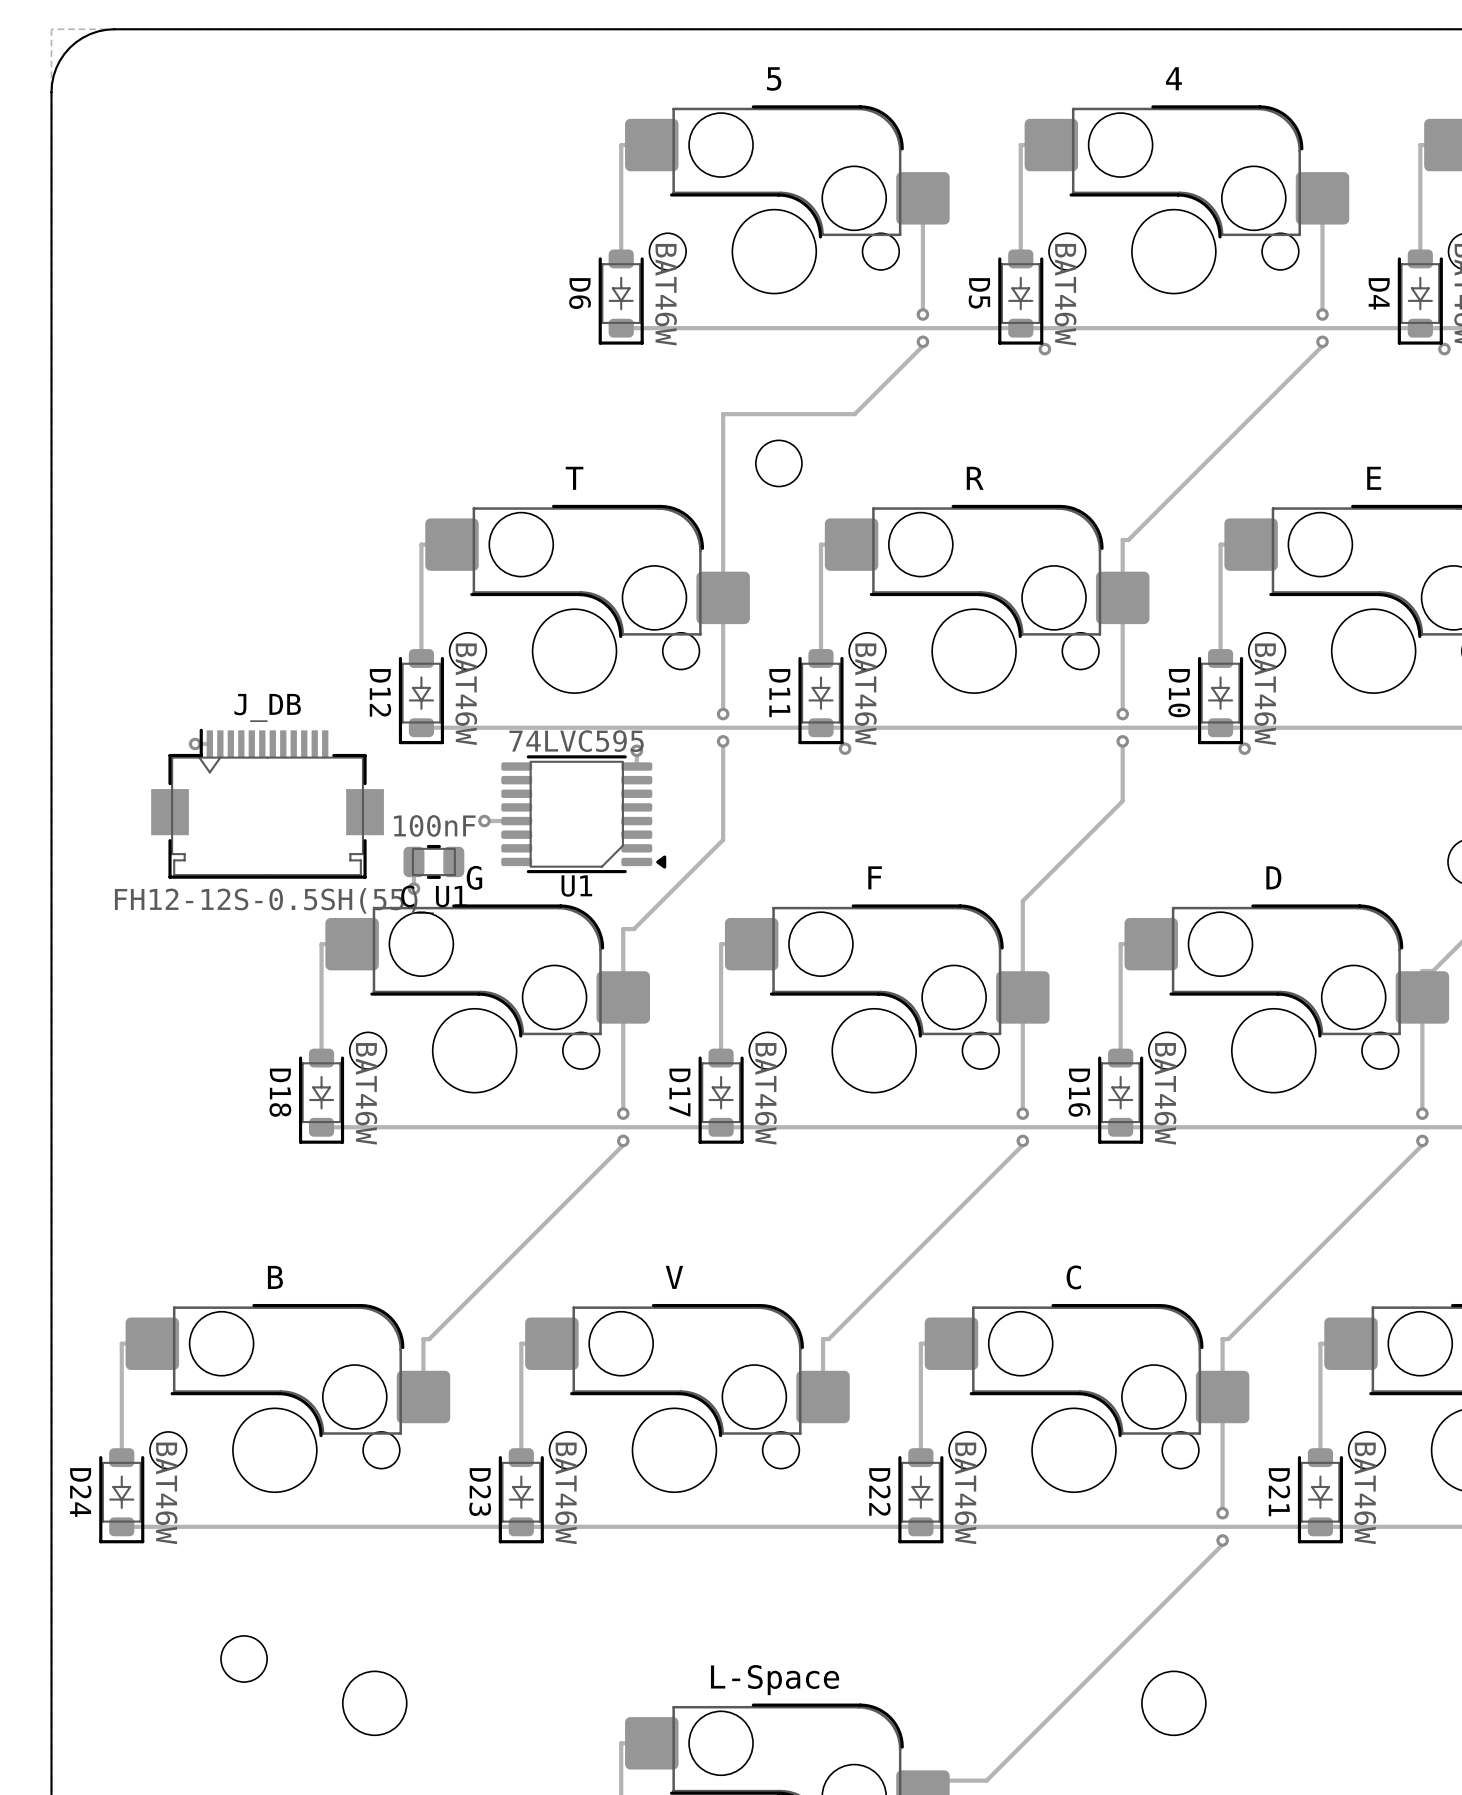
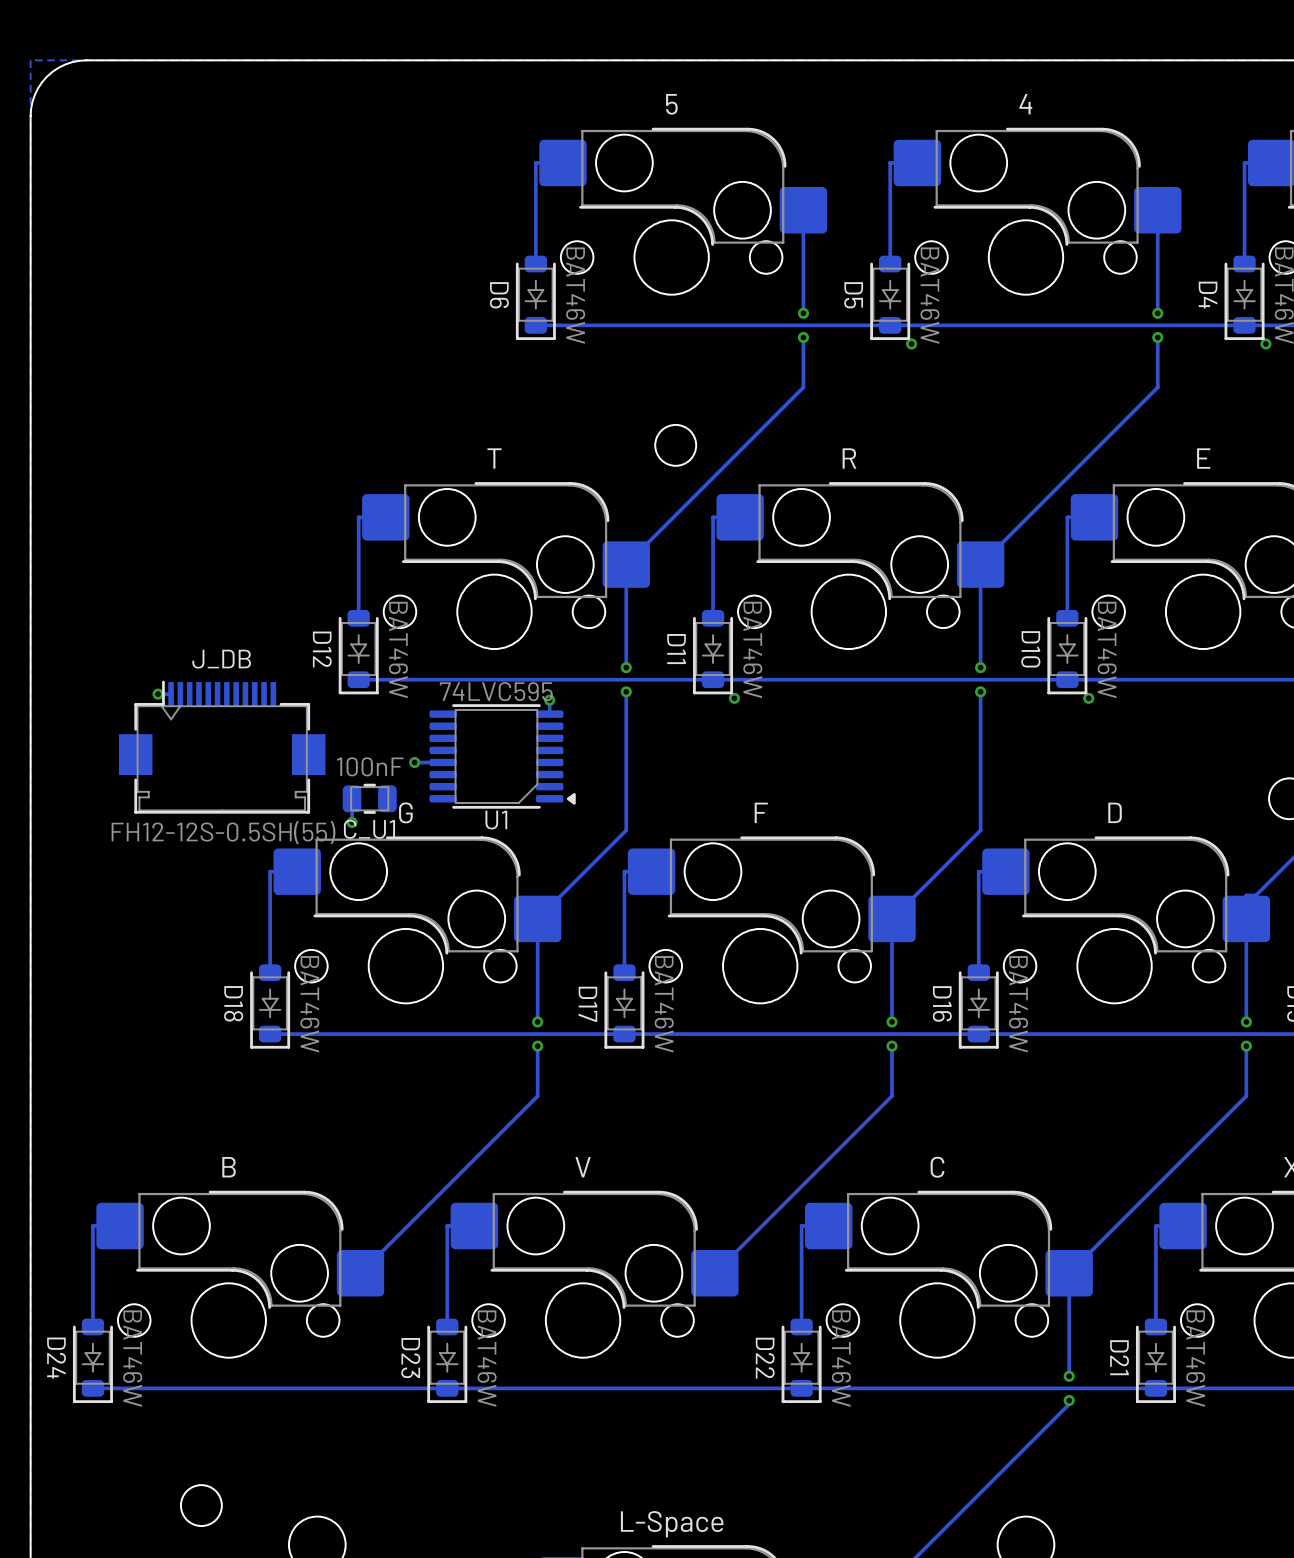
track: (922, 345) (854, 414) (723, 414) (723, 597) -> (803, 341) (803, 387) (626, 564)
track: (1322, 345) (1128, 539) (1122, 539) (1122, 597) -> (1157, 341) (1157, 387) (980, 564)
track: (1122, 801) (1022, 901) (1022, 997) -> (980, 744) (980, 830) (892, 918)
track: (723, 839) (634, 929) (623, 929) (623, 997) -> (626, 779) (626, 830) (537, 918)
track: (623, 1145) (429, 1339) (423, 1339) (423, 1397) -> (537, 1049) (537, 1096) (360, 1273)
track: (1022, 1145) (828, 1339) (823, 1339) (823, 1397) -> (892, 1049) (892, 1096) (714, 1273)
track: (1422, 1145) (1228, 1339) (1222, 1339) (1222, 1397) -> (1246, 1049) (1246, 1096) (1069, 1273)

